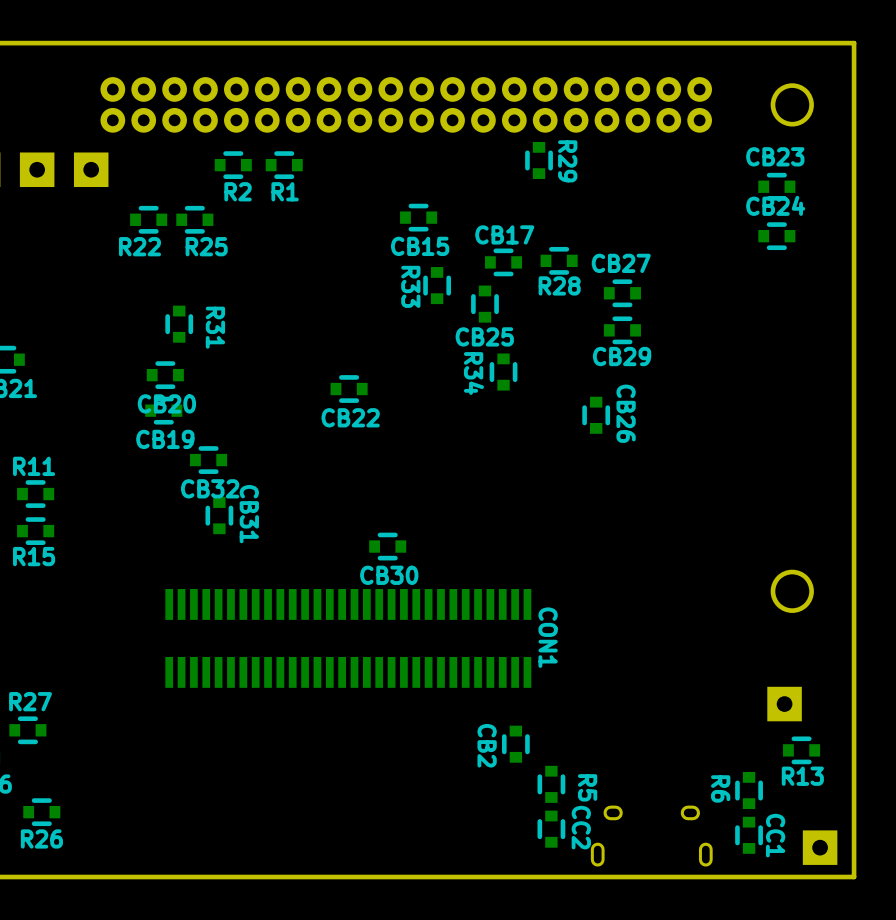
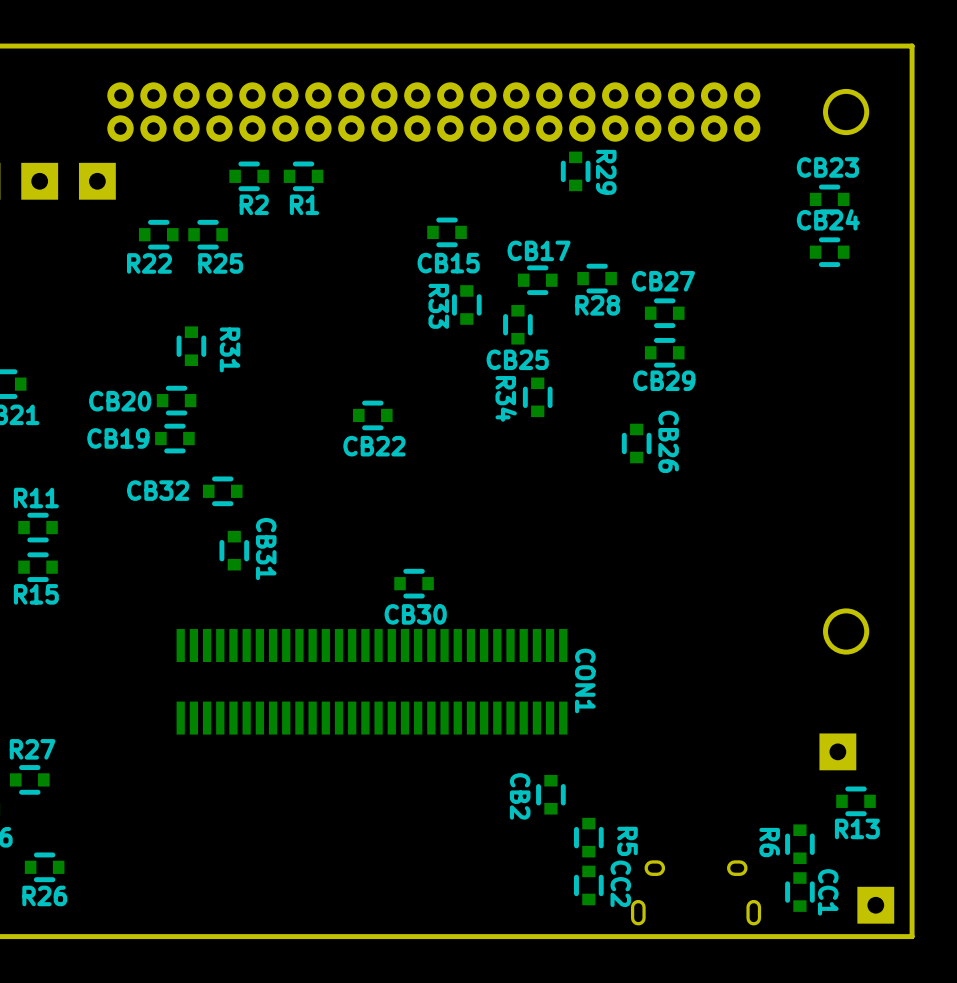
CB20 name position: CB20 (166, 403) -> CB20 (120, 401)
CB19 name position: CB19 (165, 439) -> CB19 (118, 438)
CB32 name position: CB32 (210, 488) -> CB32 (158, 490)

